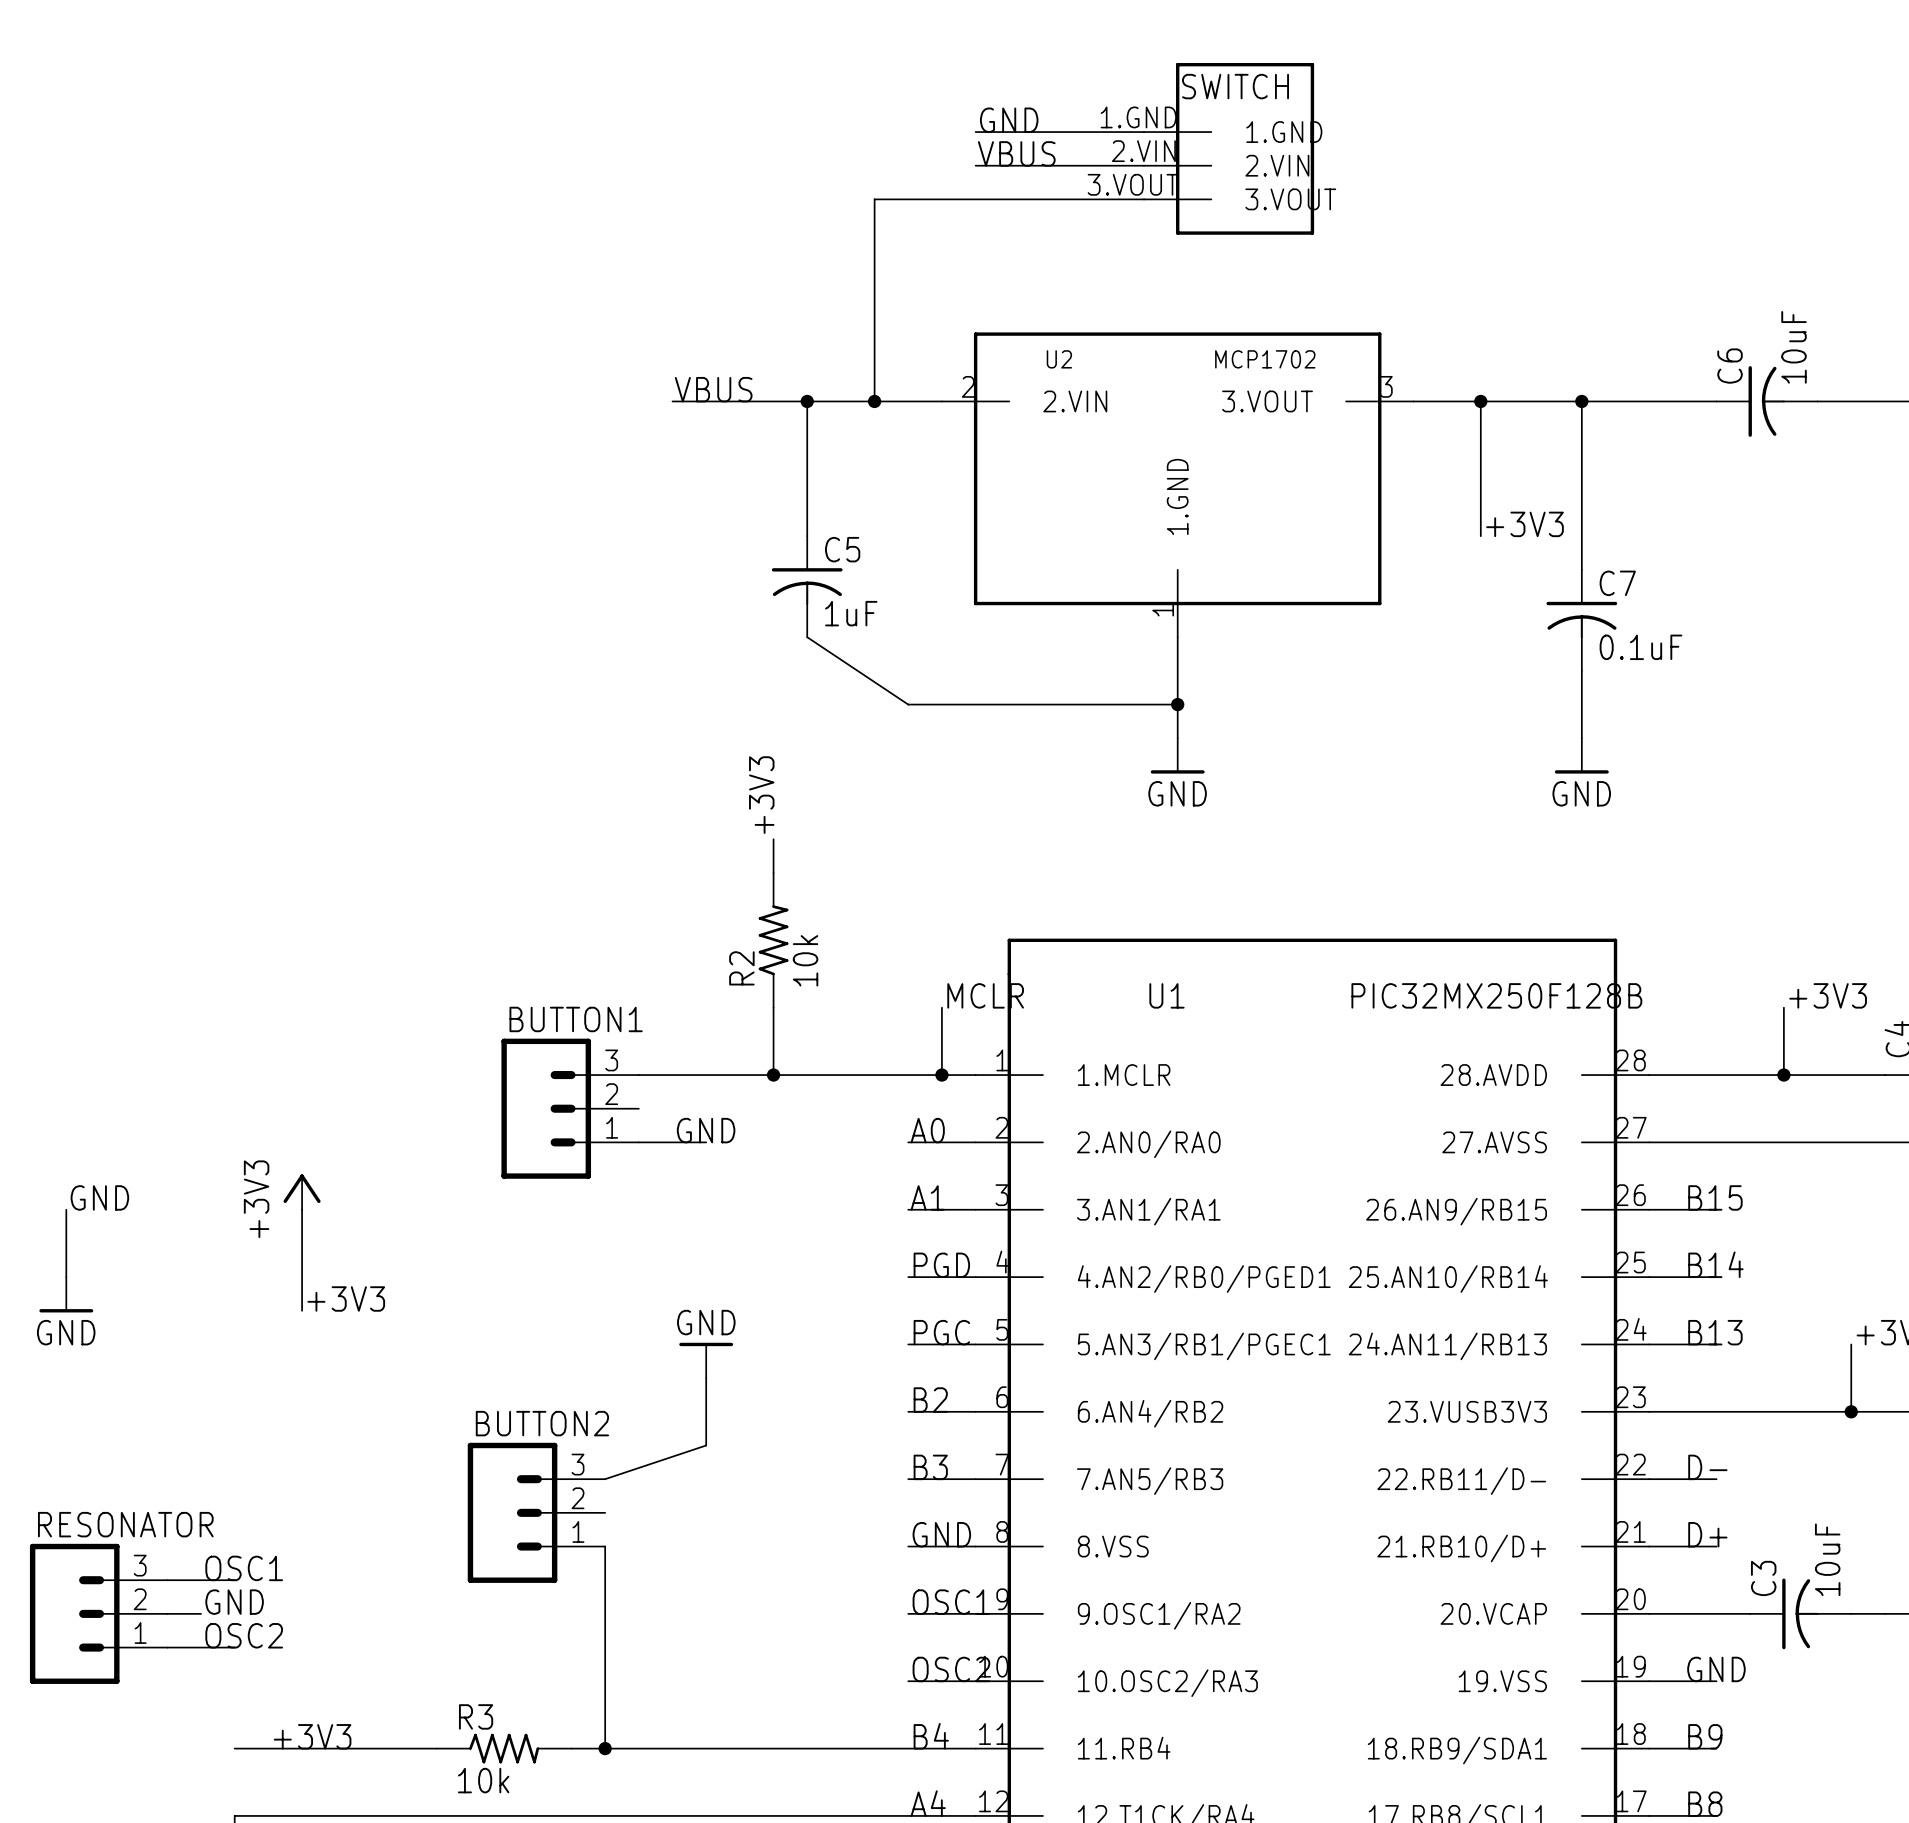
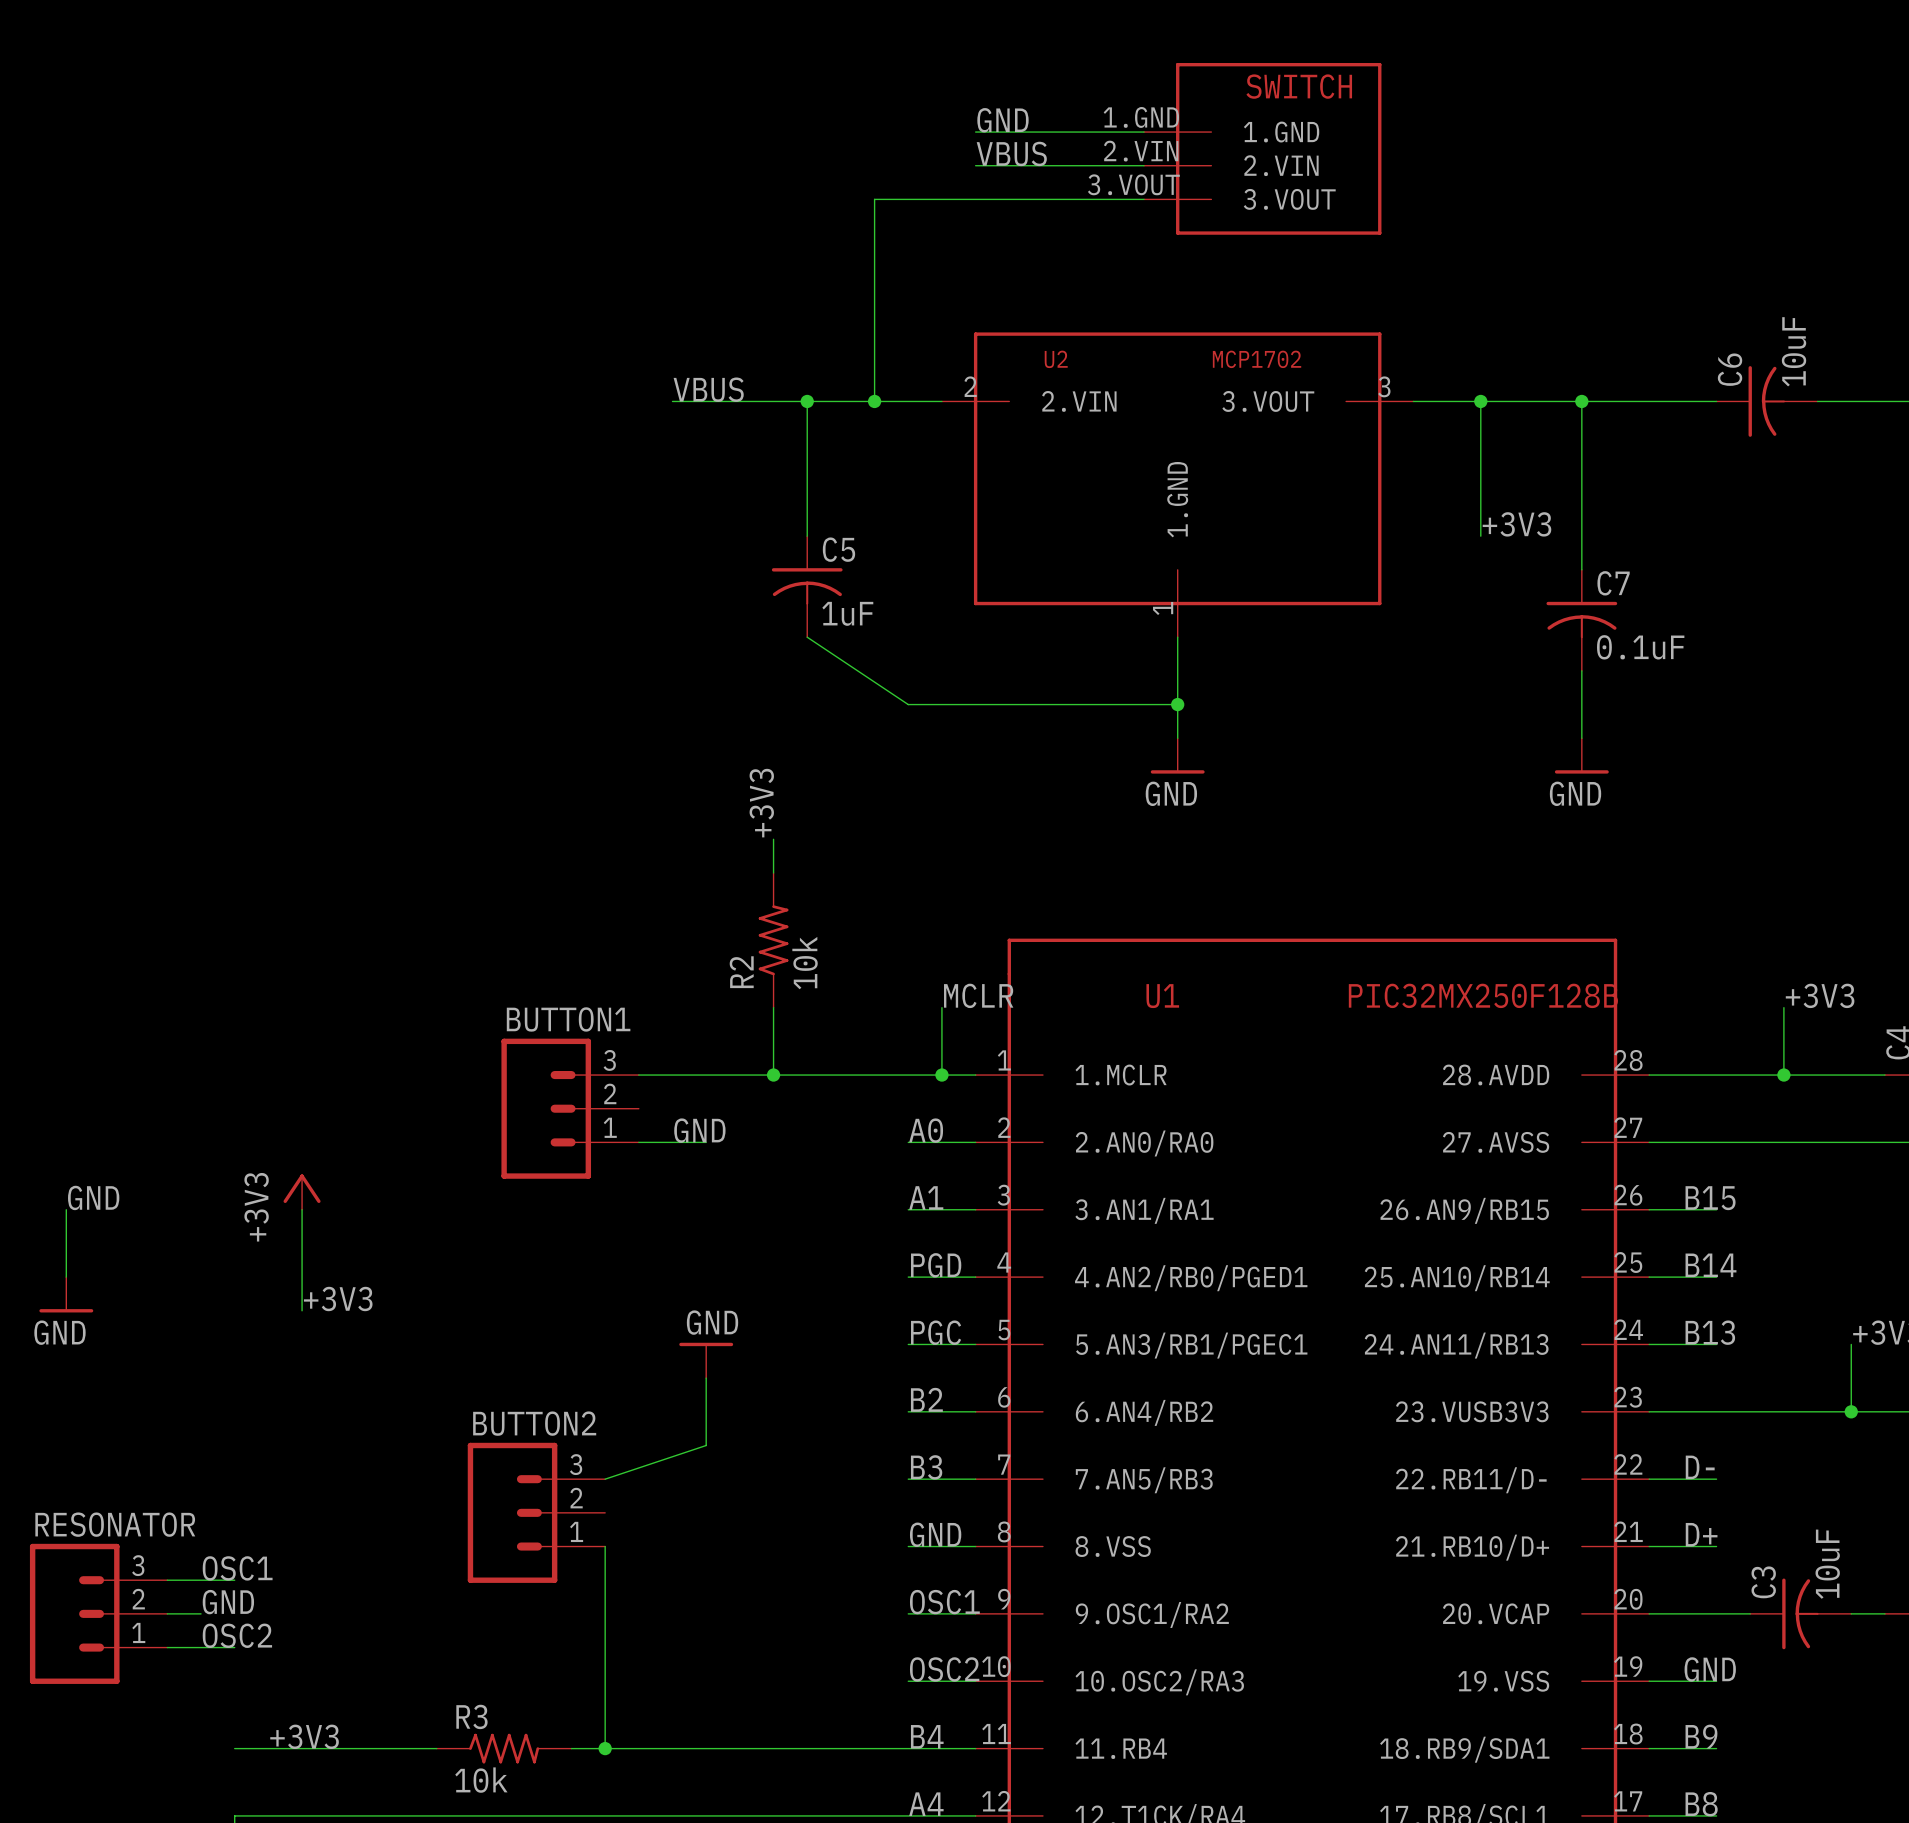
SWITCH: (1229, 148) -> none
SWITCH: none -> (1262, 148)

